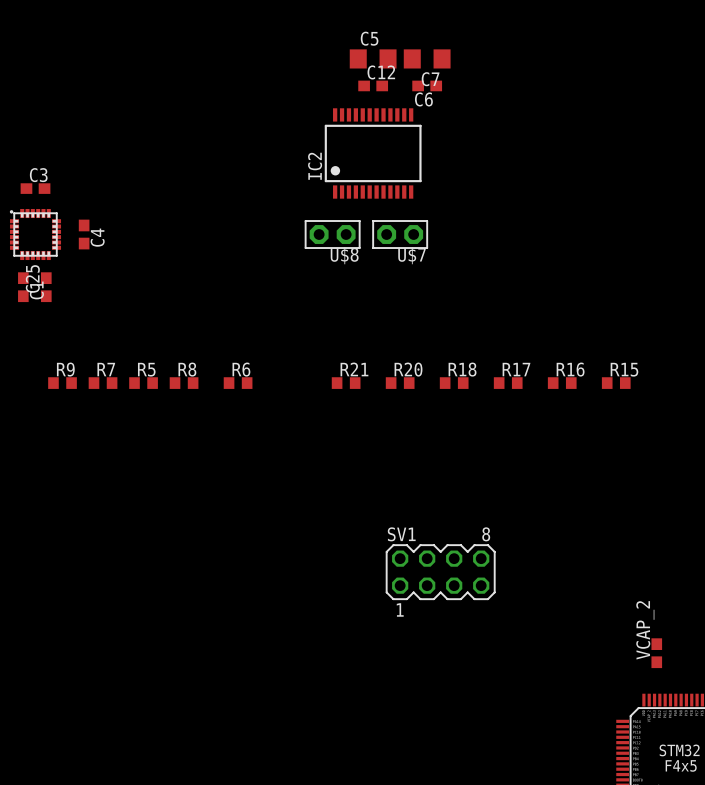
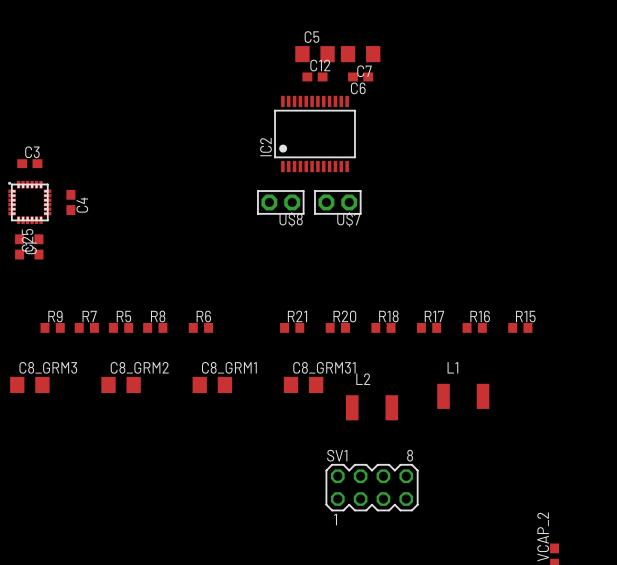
C8_GRM3: none -> (29, 384)
C8_GRM2: none -> (121, 384)
C8_GRM1: none -> (212, 384)
C8_GRM31: none -> (303, 384)
L1: none -> (463, 396)
L2: none -> (372, 407)

